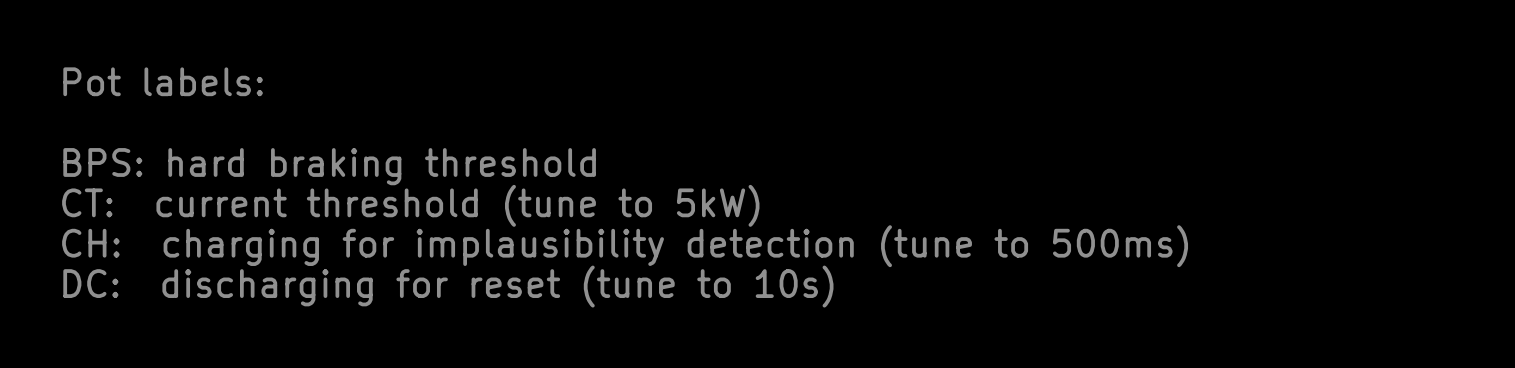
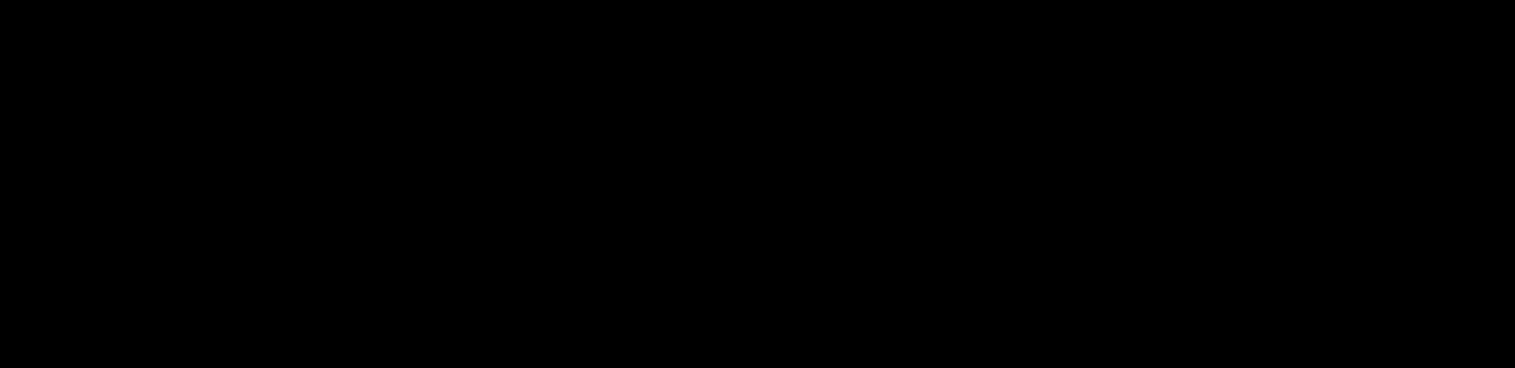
text: Pot labels: (163, 81) -> none
text: BPS: hard braking threshold (329, 166) -> none
text: CT: current threshold (tune to 5kW) (410, 205) -> none
text: CH: charging for implausibility detection (tune to 500ms) (625, 246) -> none
text: DC: discharging for reset (tune to 10s) (448, 286) -> none

